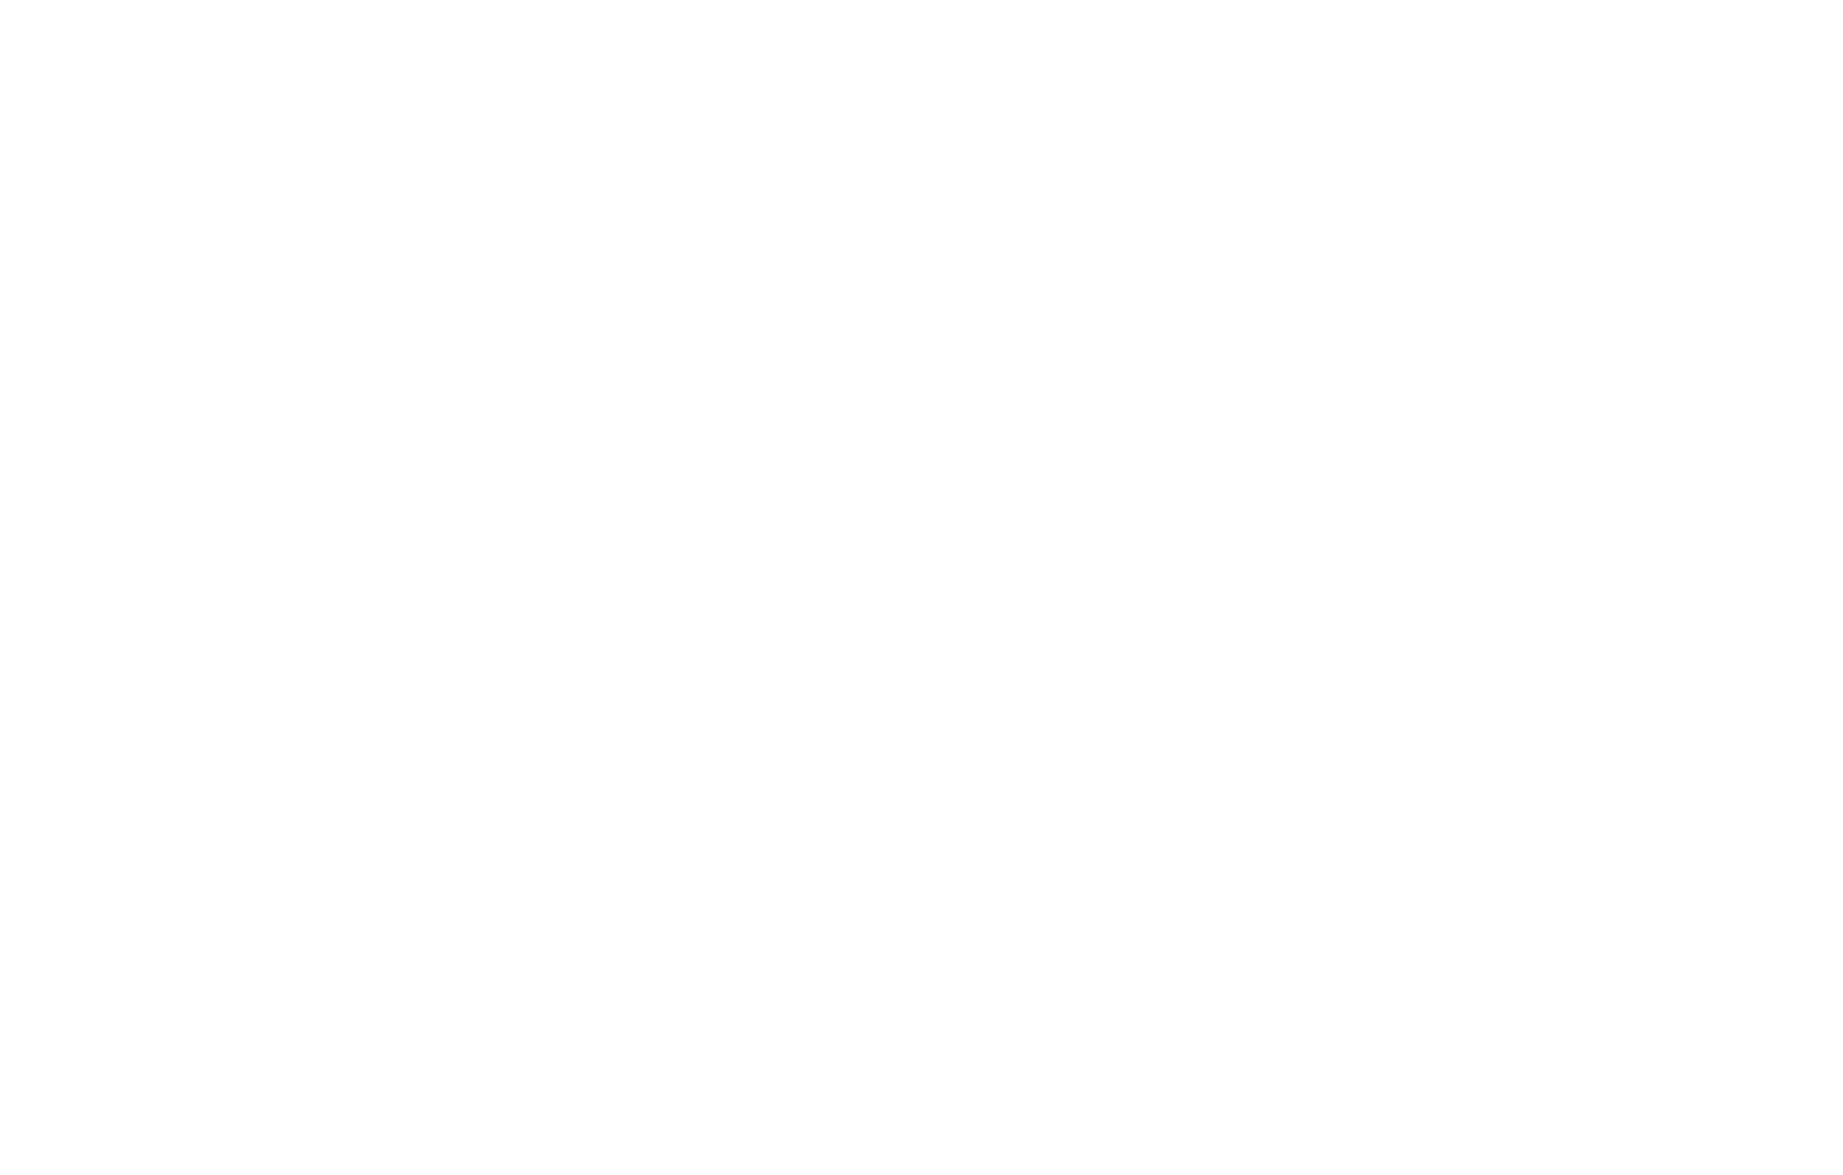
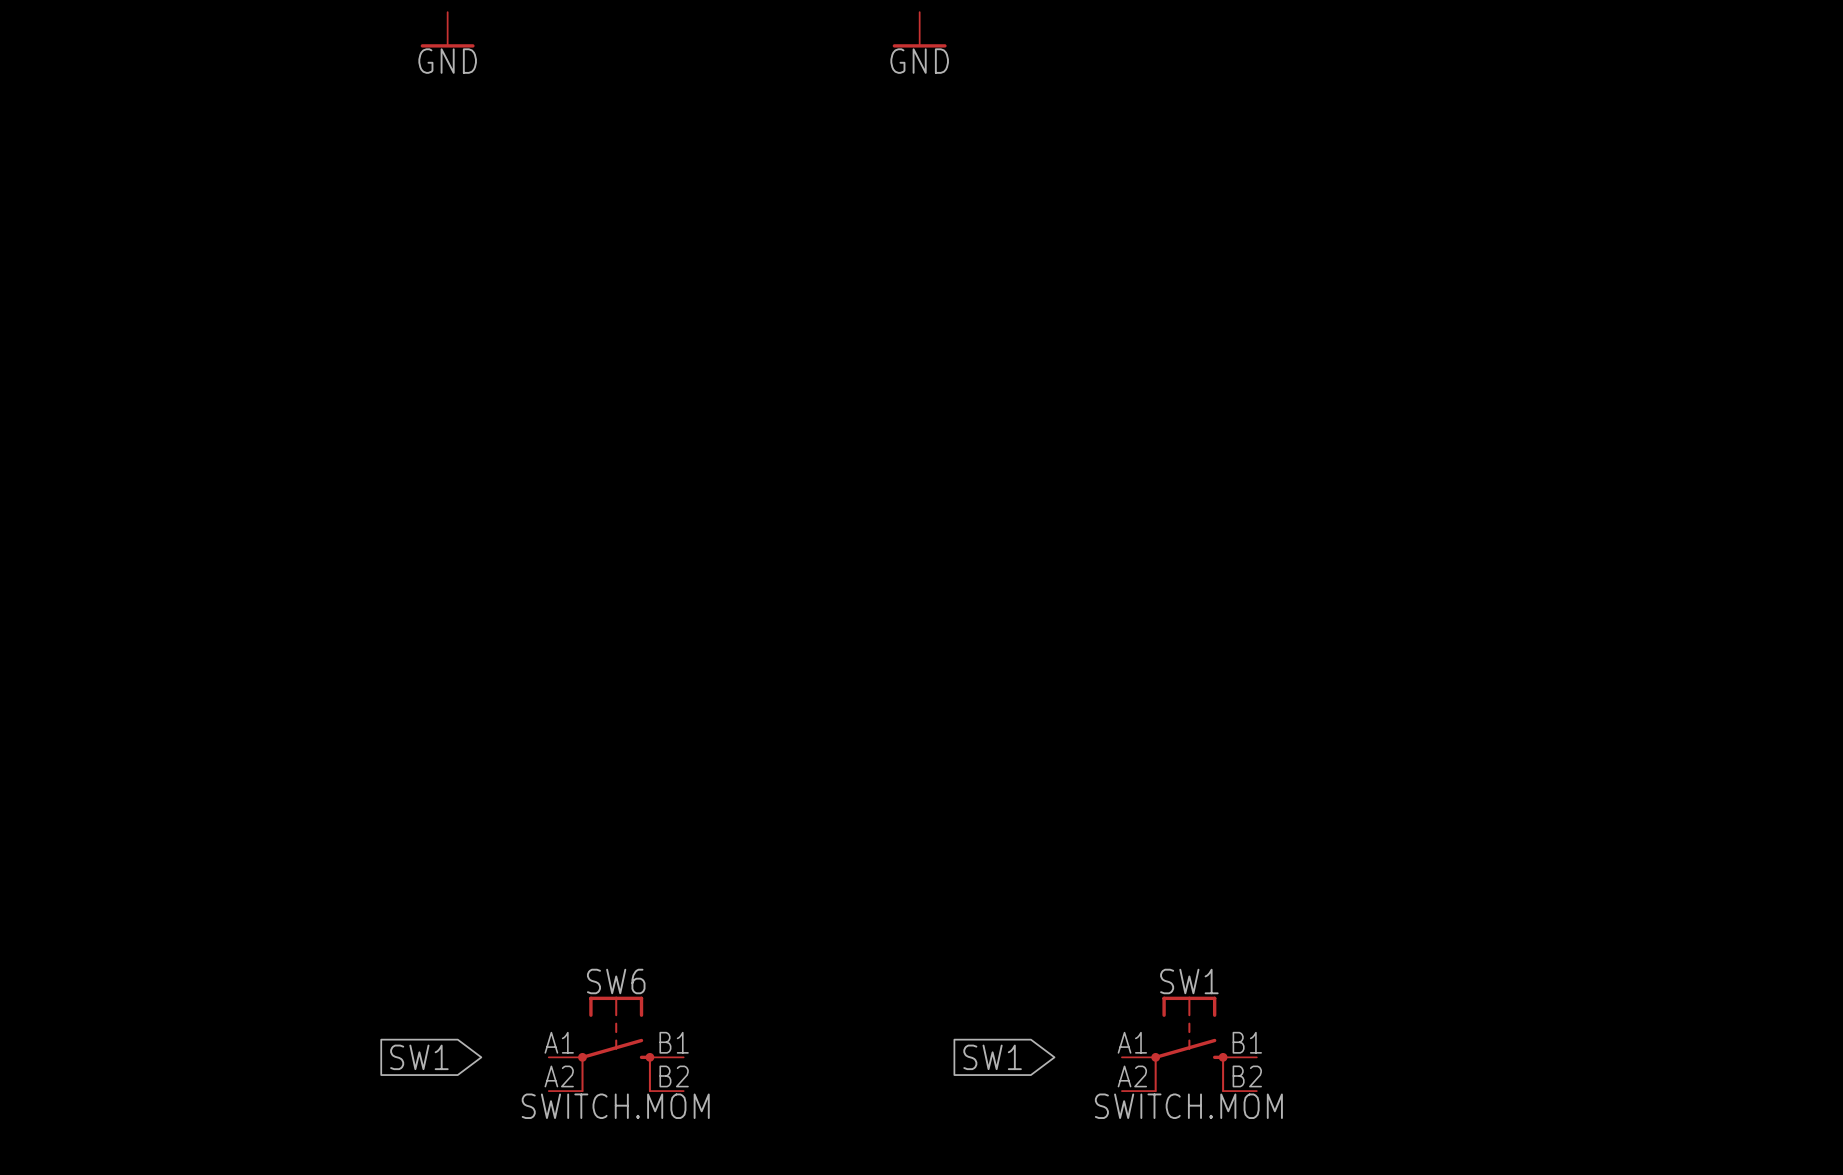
power symbol: none -> GND (447, 29)
power symbol: none -> GND (919, 29)
SW6: none -> SWITCH.MOM (616, 1044)
SW1: none -> SWITCH.MOM (1189, 1044)
global label: none -> SW1 (419, 1057)
global label: none -> SW1 (992, 1057)

